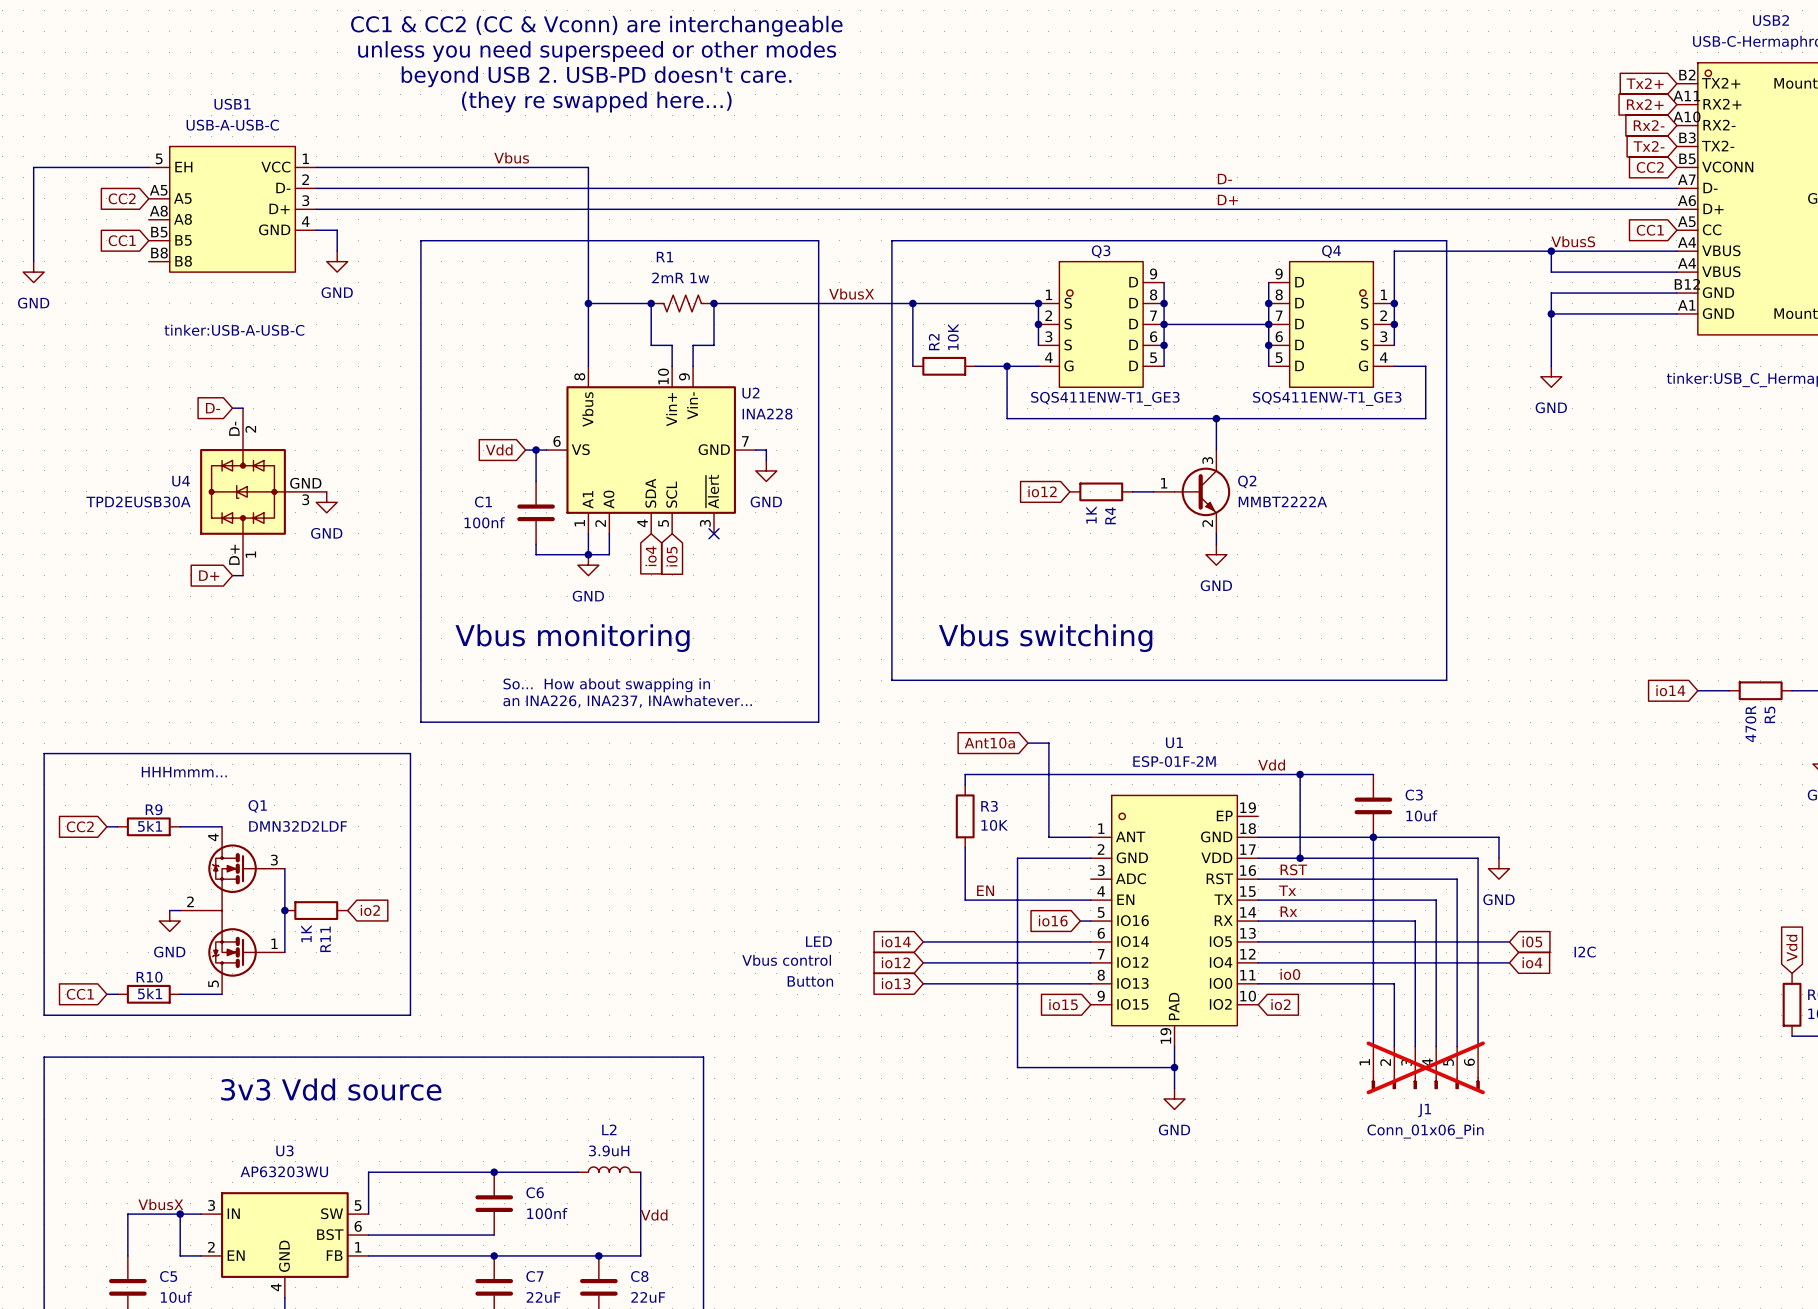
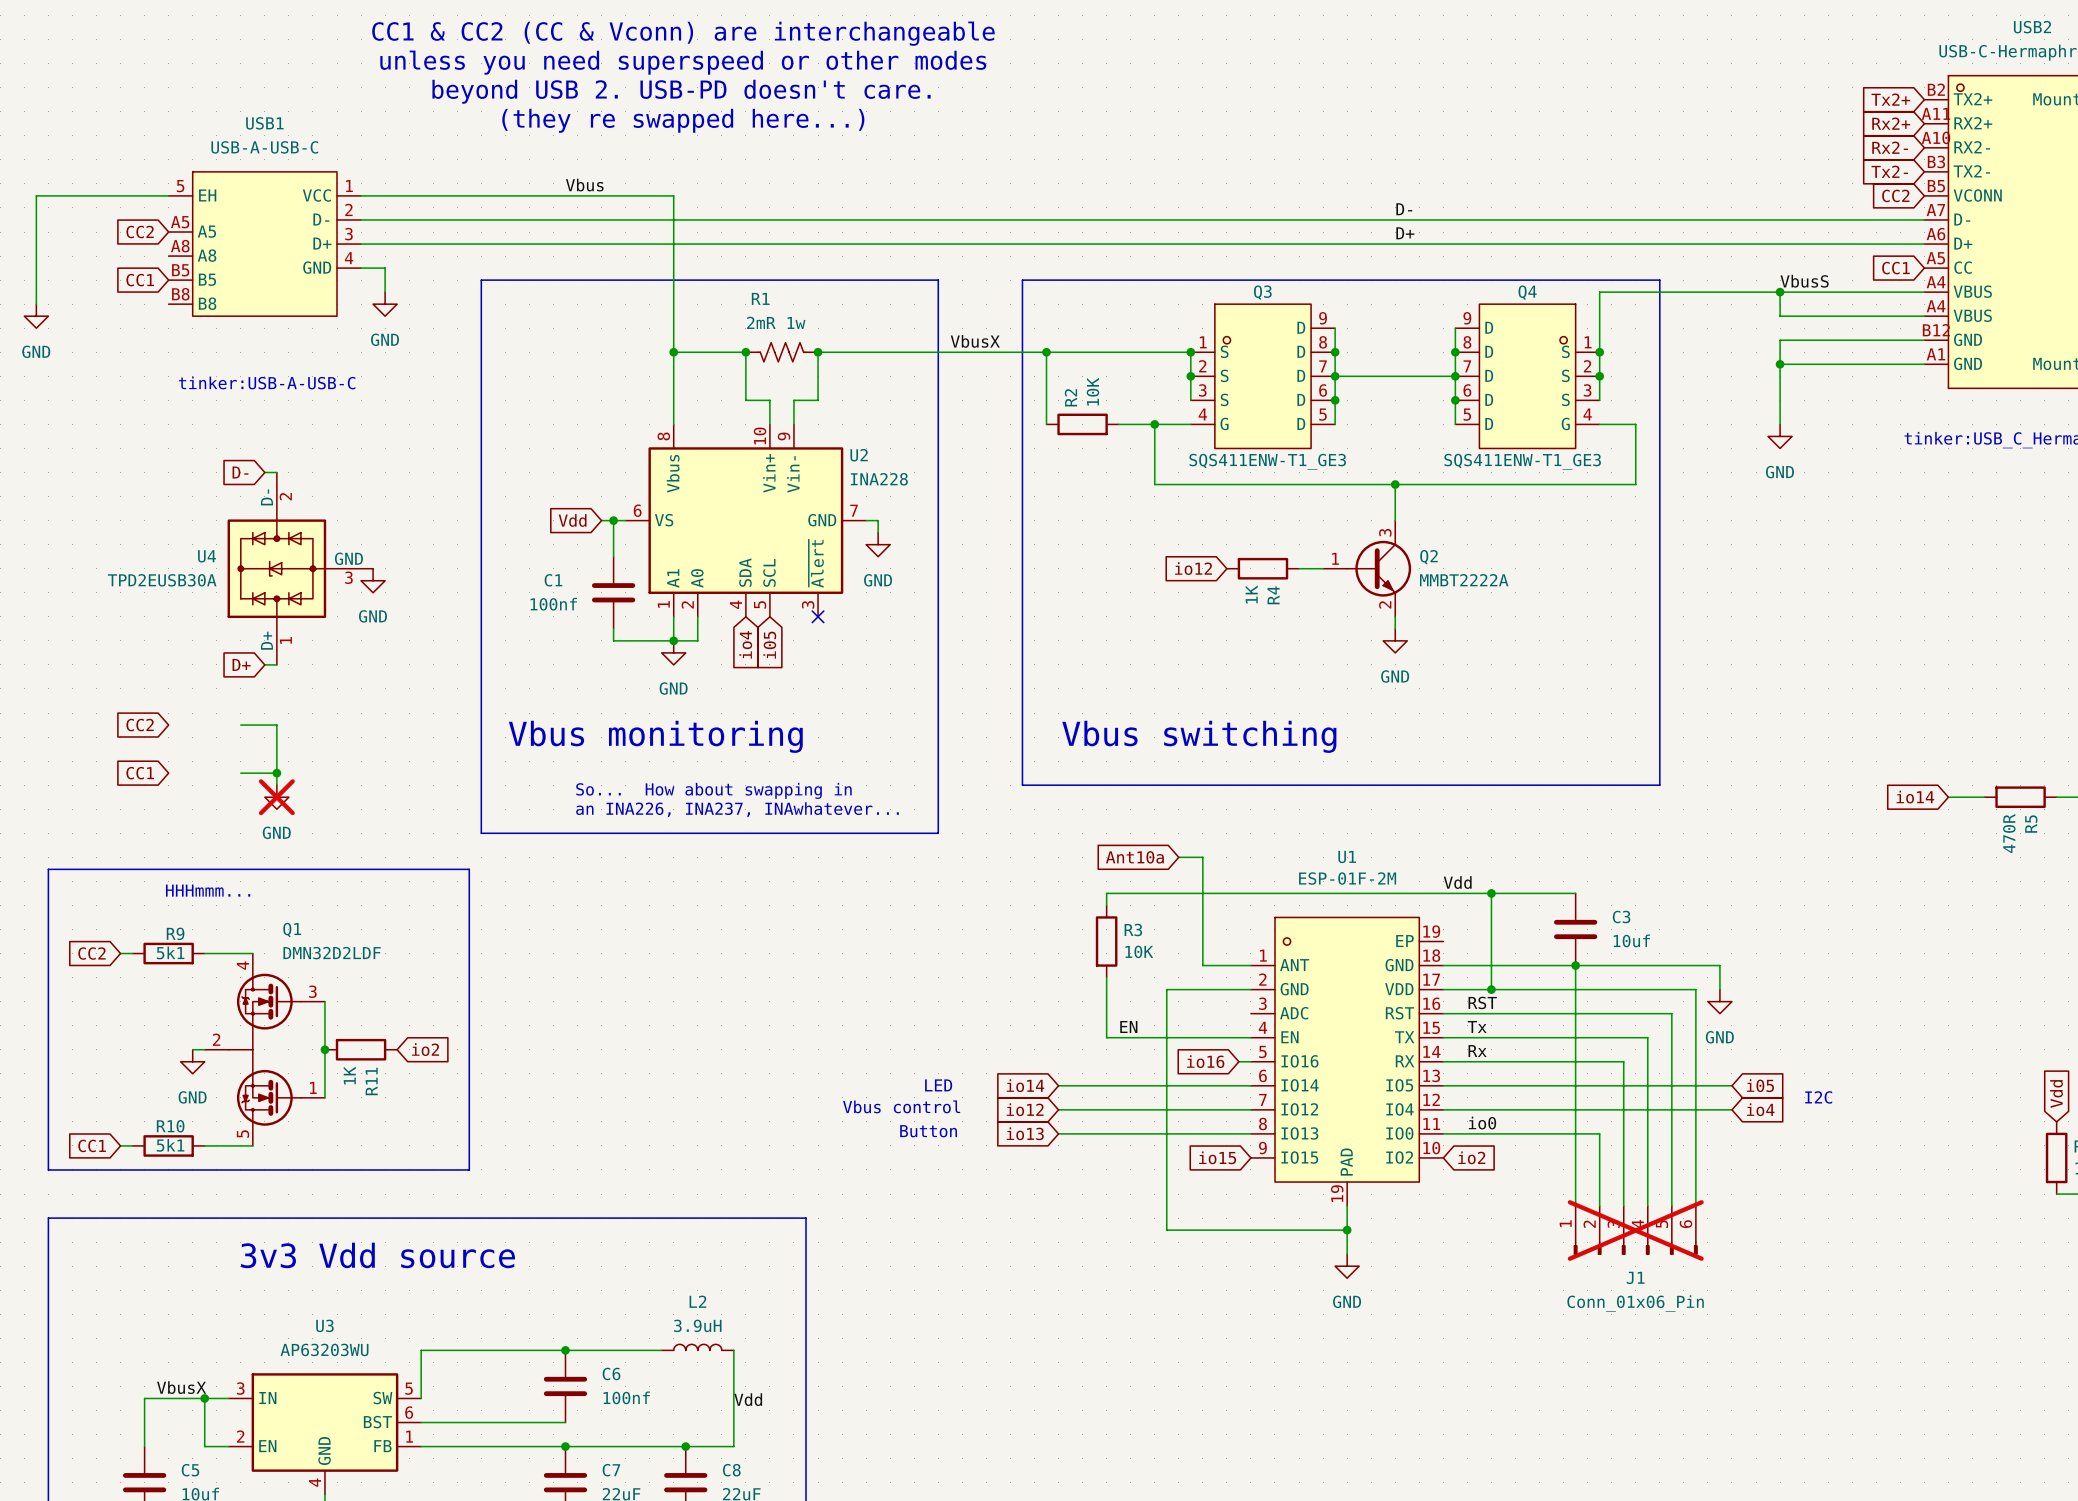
global label: none -> CC2 (140, 725)
wire: none -> (240, 725) (276, 725) (276, 785)
global label: none -> CC1 (140, 773)
wire: none -> (240, 773) (276, 773)
junction: none -> (276, 773)
power symbol: none -> GND (276, 797)

